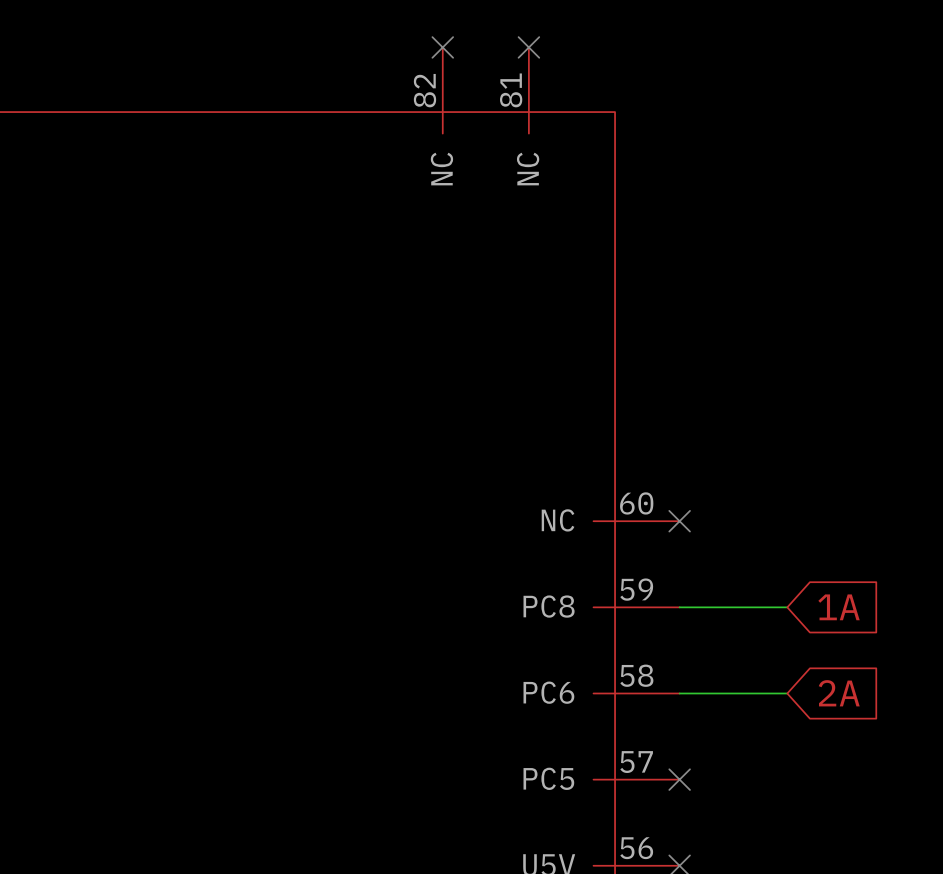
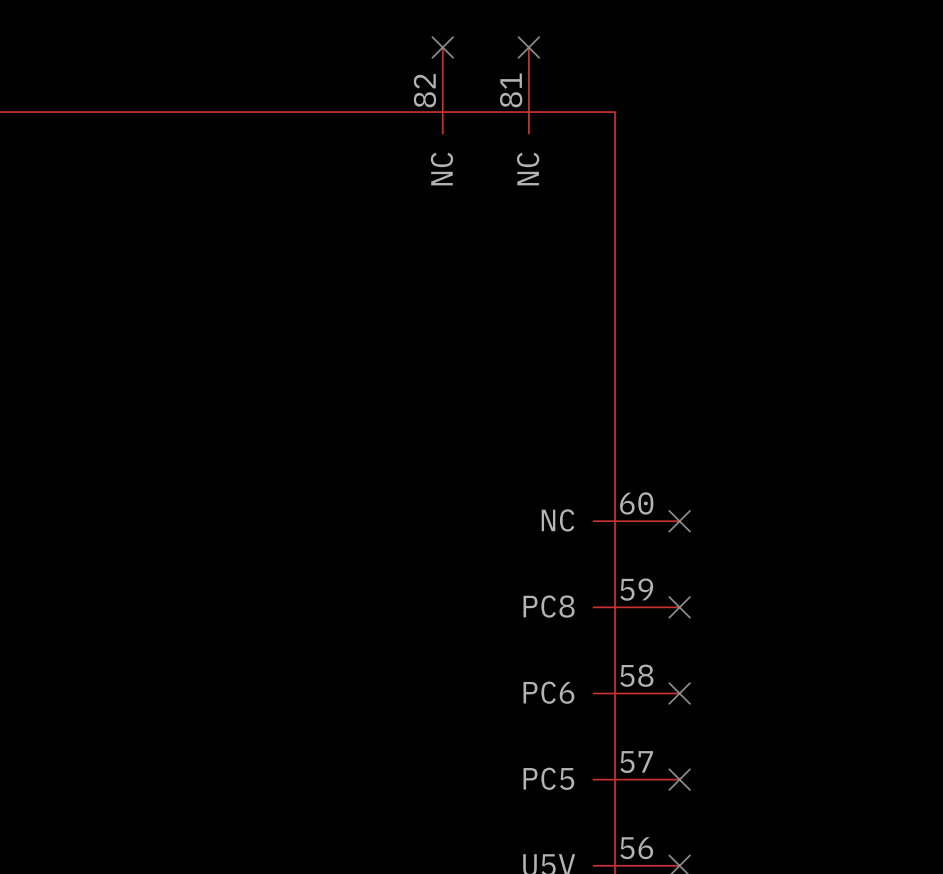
wire: (679, 607) (787, 607) -> none
no-connect mark: none -> (679, 607)
global label: 1A (839, 607) -> none
wire: (679, 693) (787, 693) -> none
no-connect mark: none -> (679, 693)
global label: 2A (839, 693) -> none

